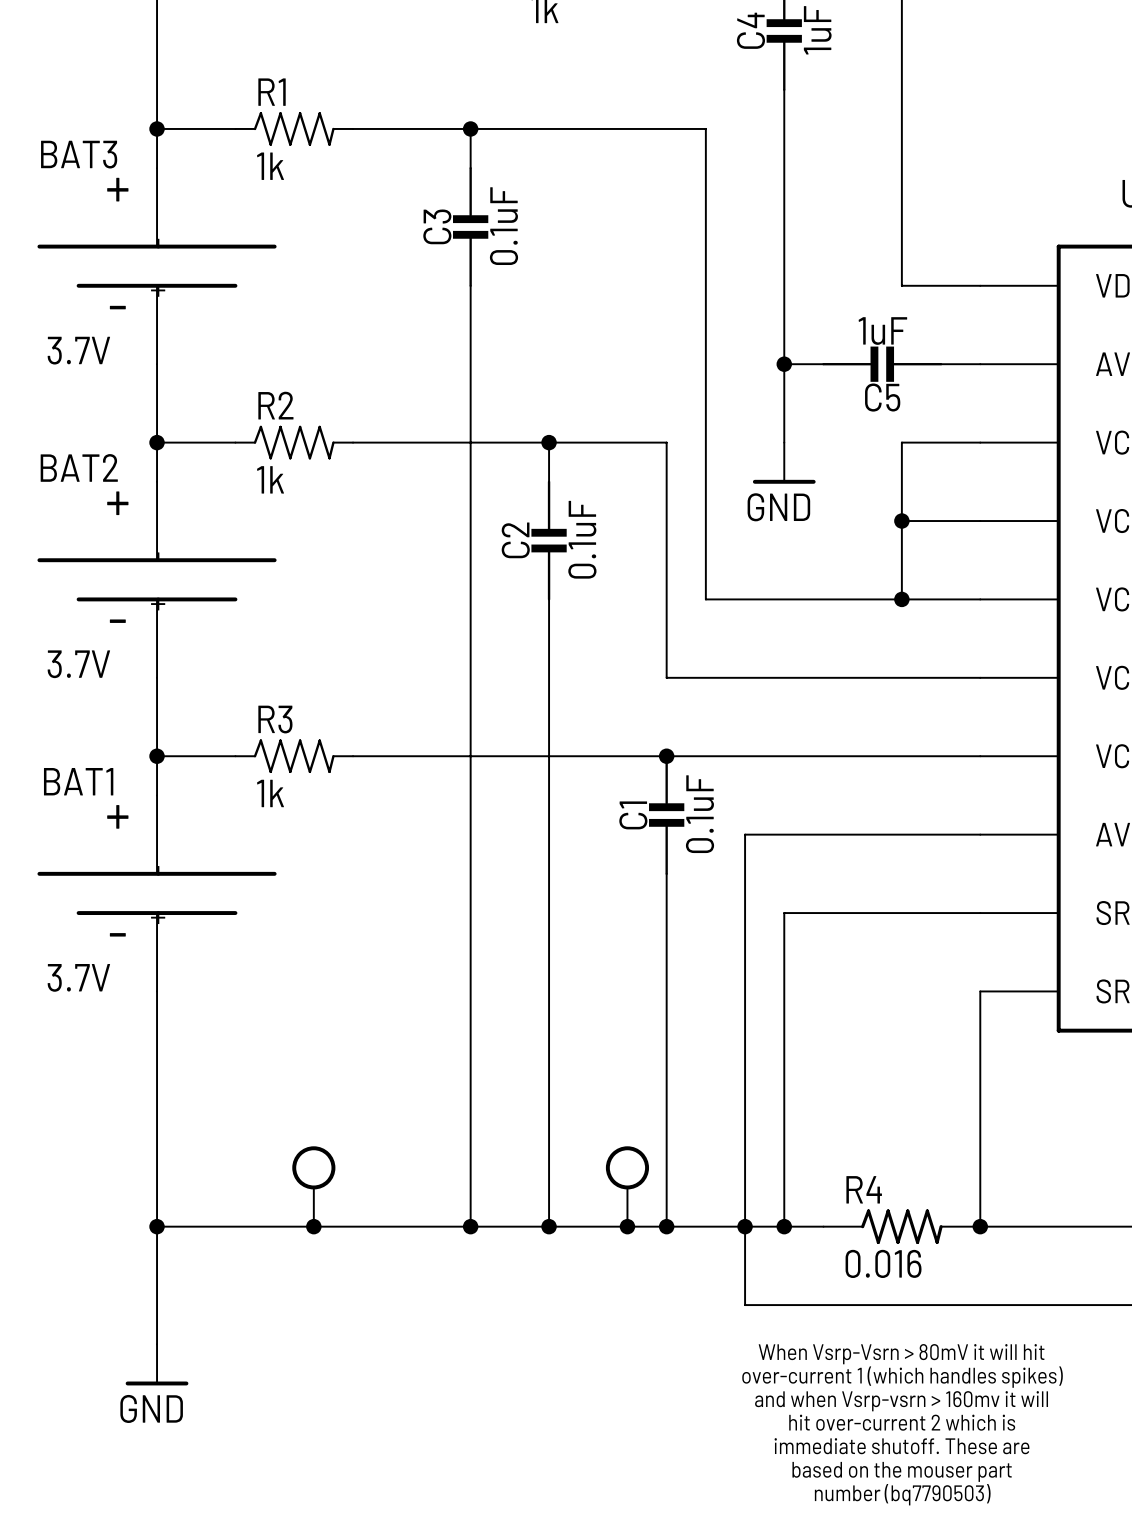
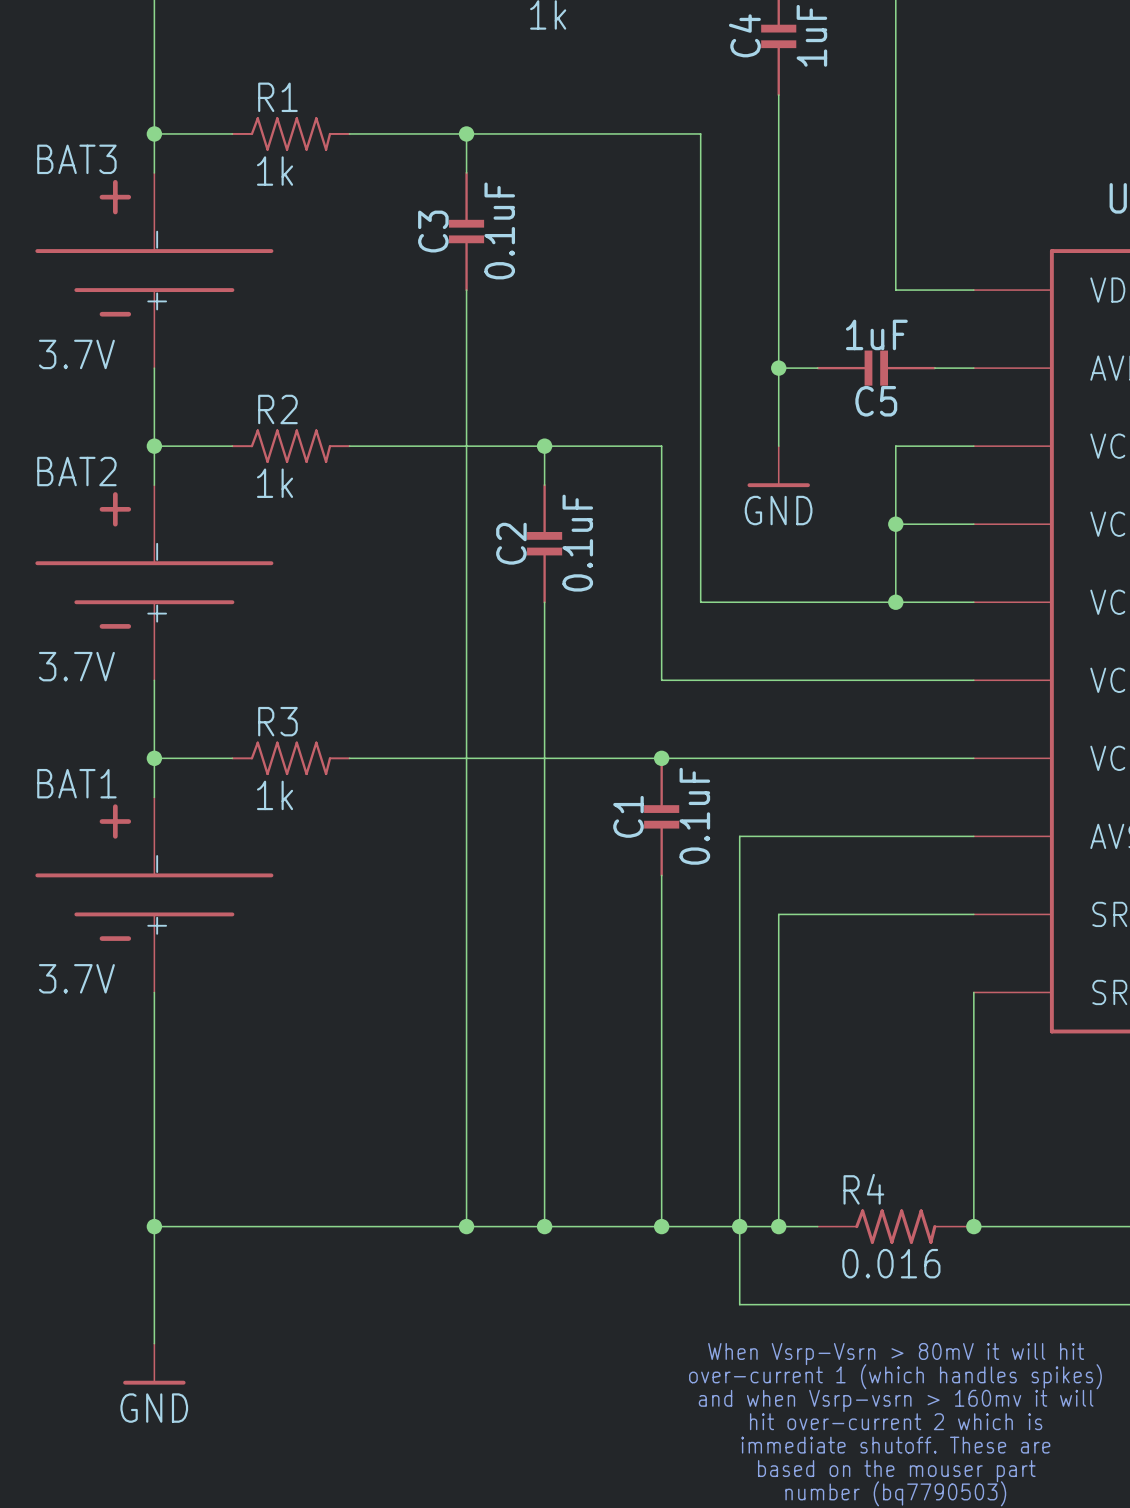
part: (313, 1186) -> none
part: (627, 1186) -> none
junction: (313, 1226) -> none
junction: (627, 1226) -> none

